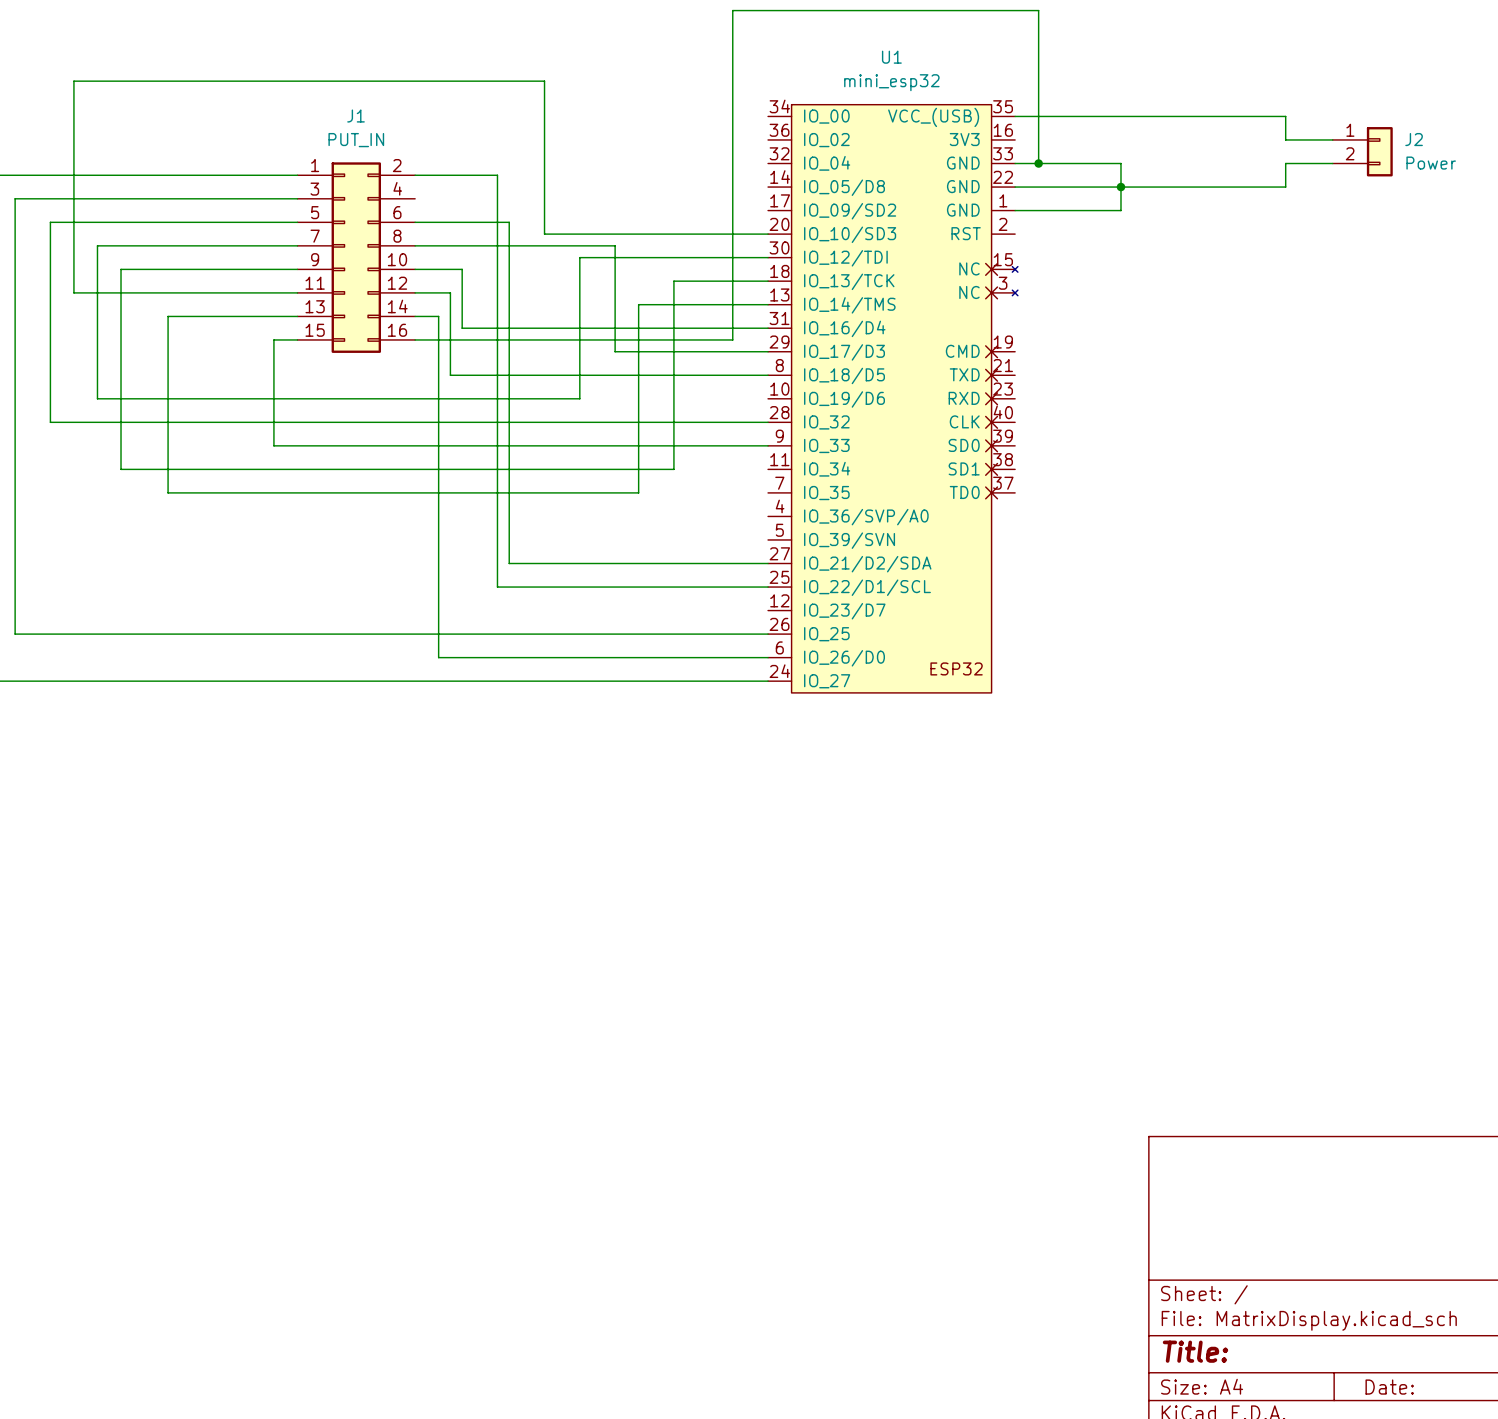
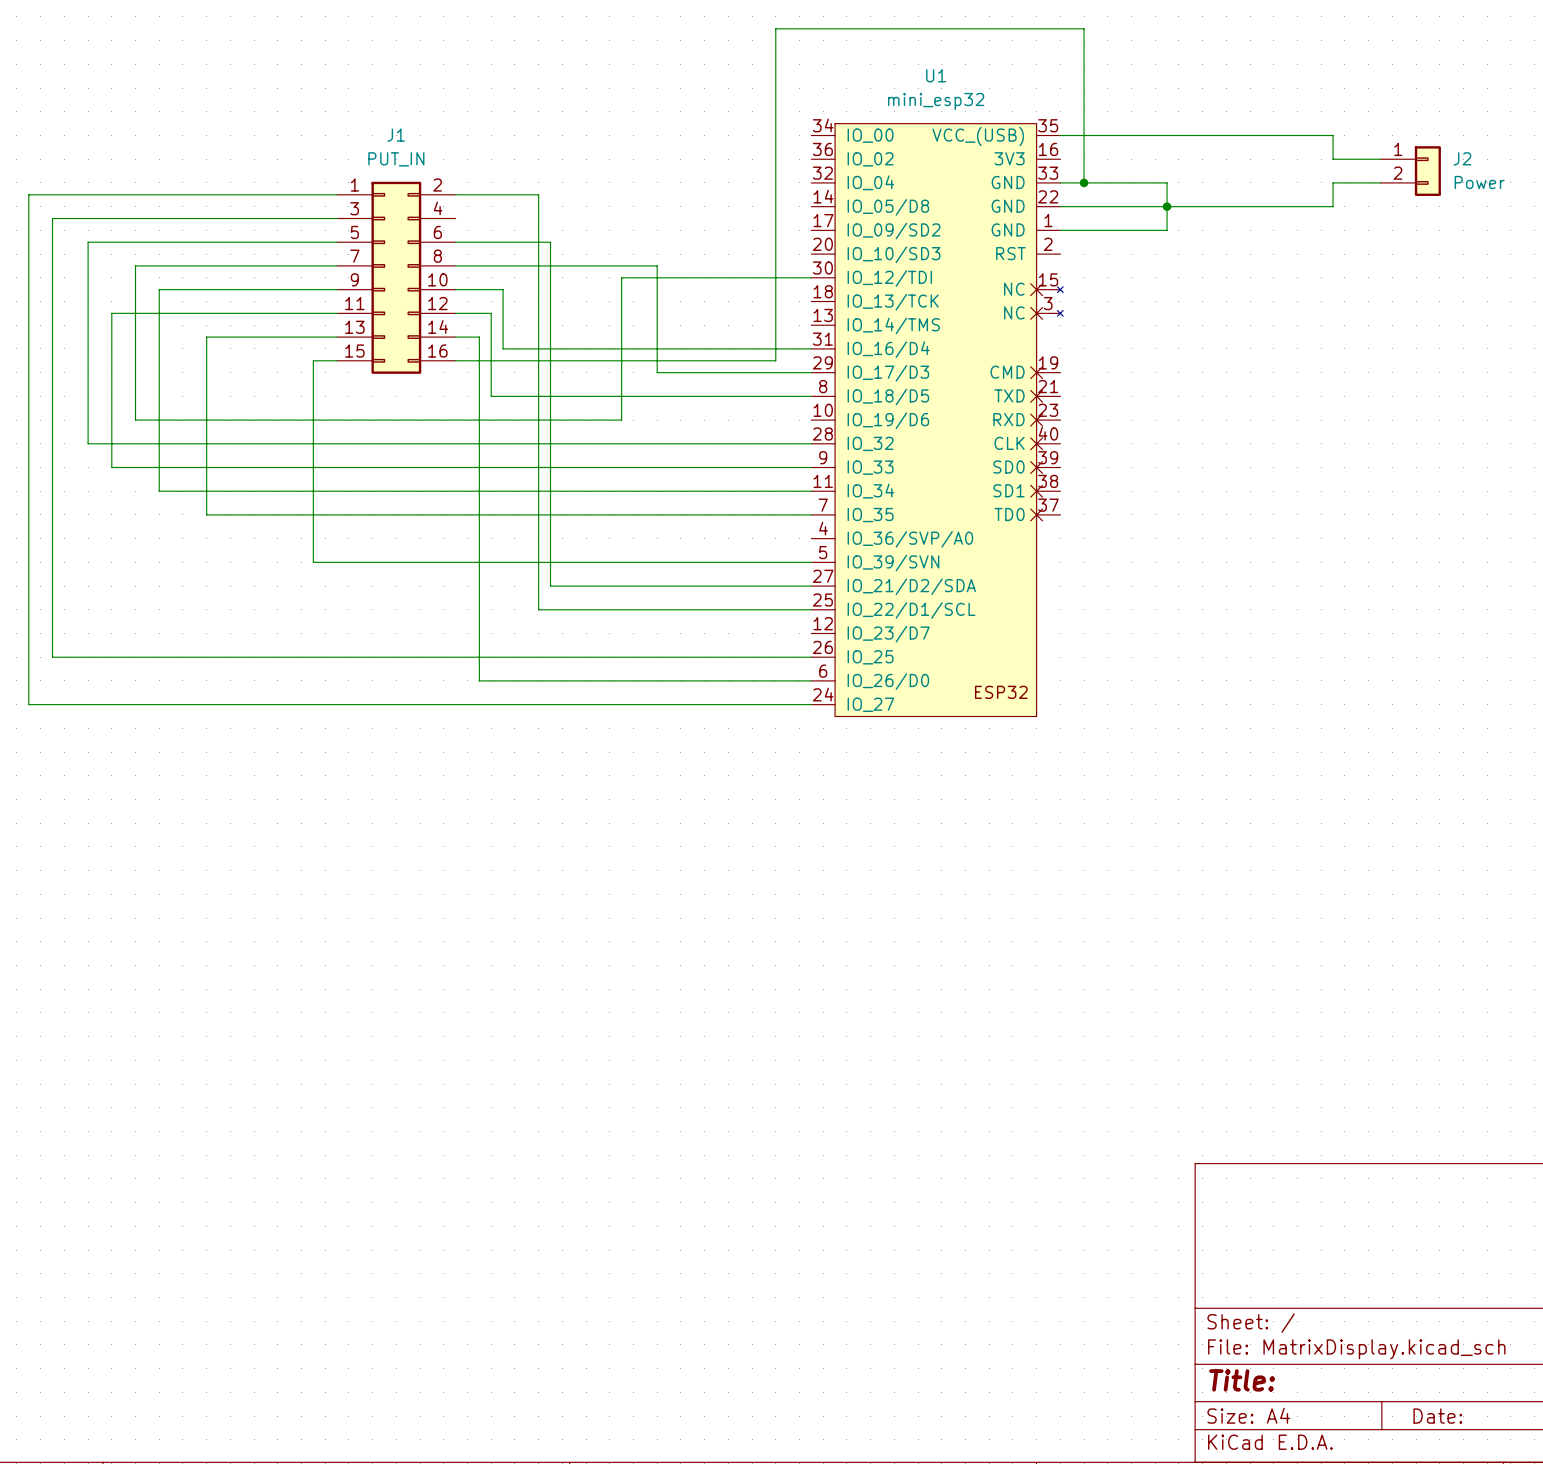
wire: (768, 234) (544, 234) (544, 81) (73, 81) (73, 292) -> (811, 562) (313, 562) (313, 467) (111, 467) (111, 313)
wire: (768, 281) (673, 281) (673, 469) -> (811, 491) (716, 491)
wire: (768, 304) (638, 304) (638, 492) -> (811, 514) (680, 514)

